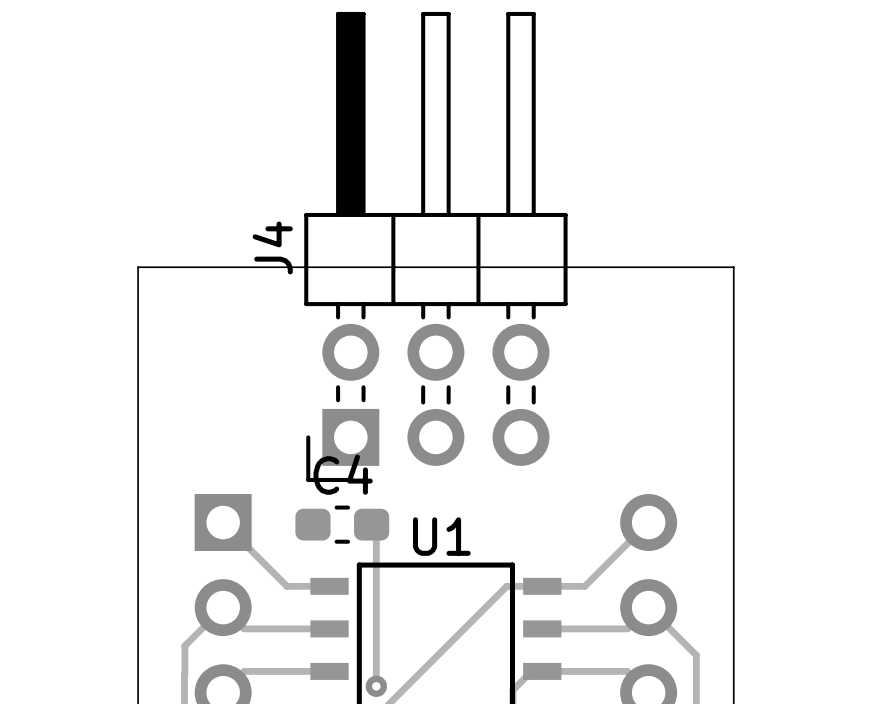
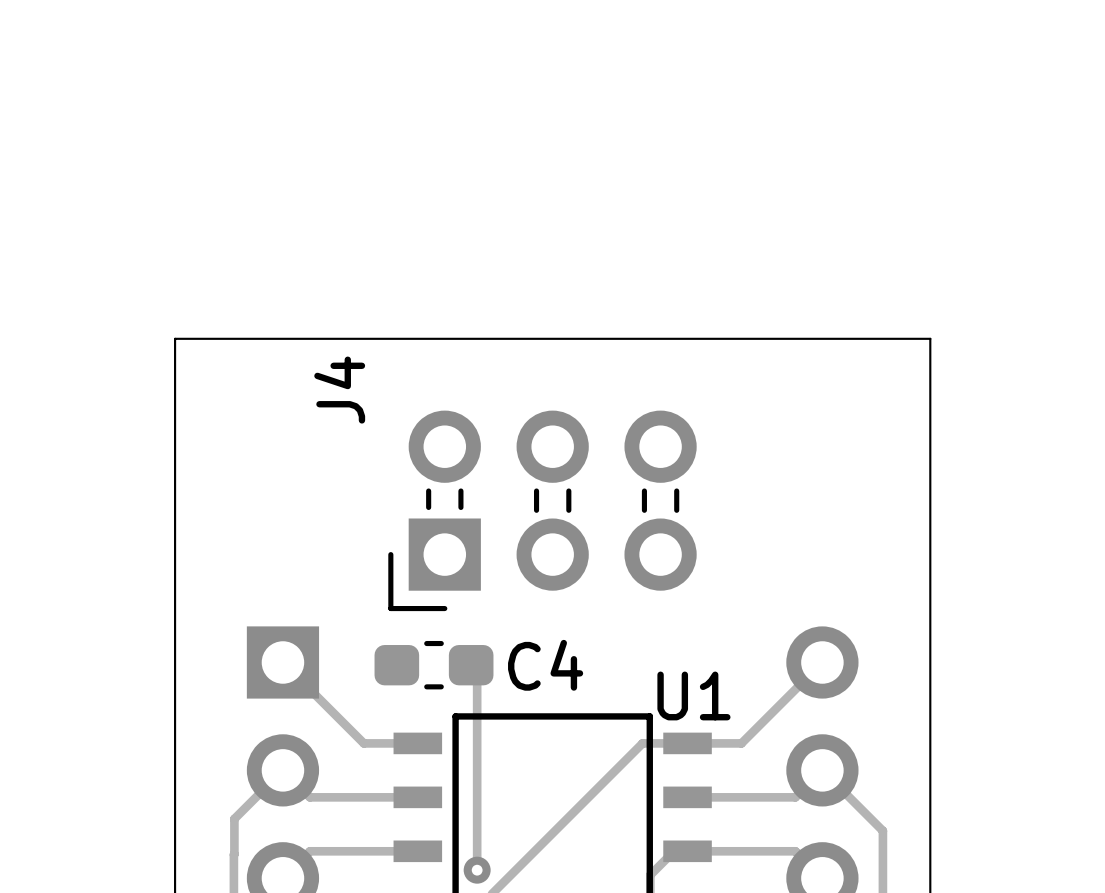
J4 footprint: [304, 11, 568, 482] -> [388, 410, 697, 612]
J4 name position: J4 (272, 247) -> J4 (339, 390)
C4 name position: C4 (343, 474) -> C4 (545, 665)
U1 name position: U1 (441, 536) -> U1 (693, 695)

